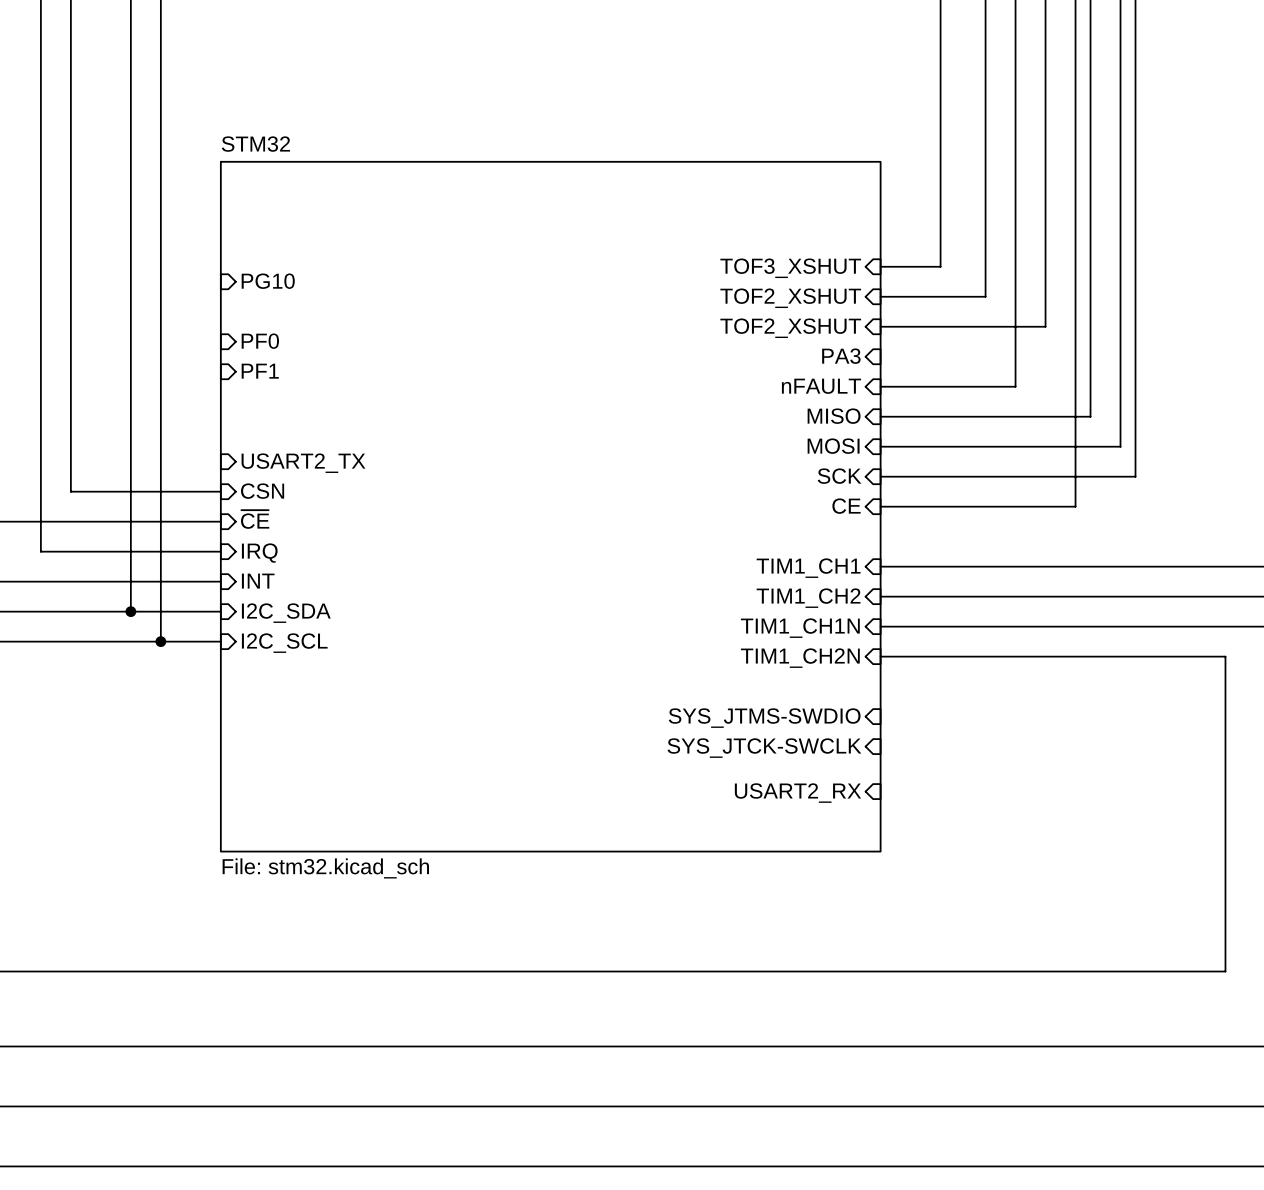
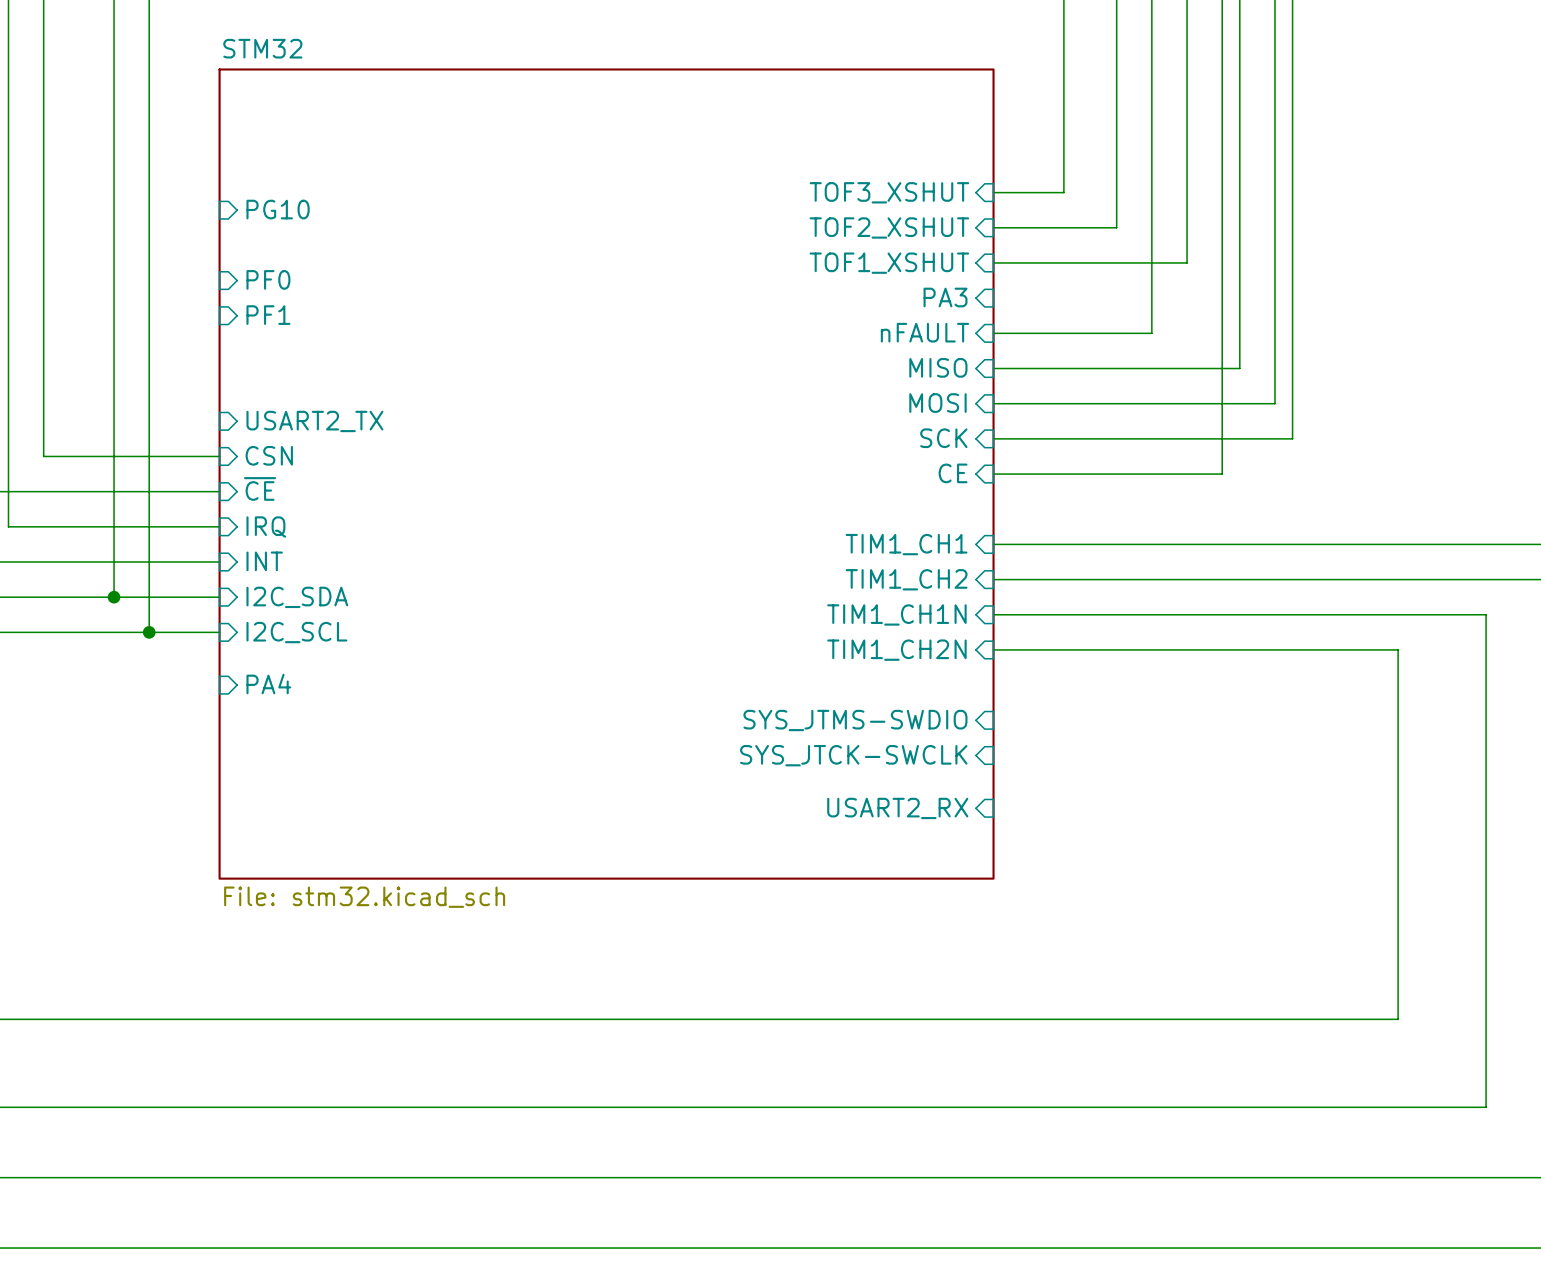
sheet pin: TOF2_XSHUT (790, 328) -> TOF1_XSHUT (889, 263)
sheet pin: none -> PA4 (268, 684)

